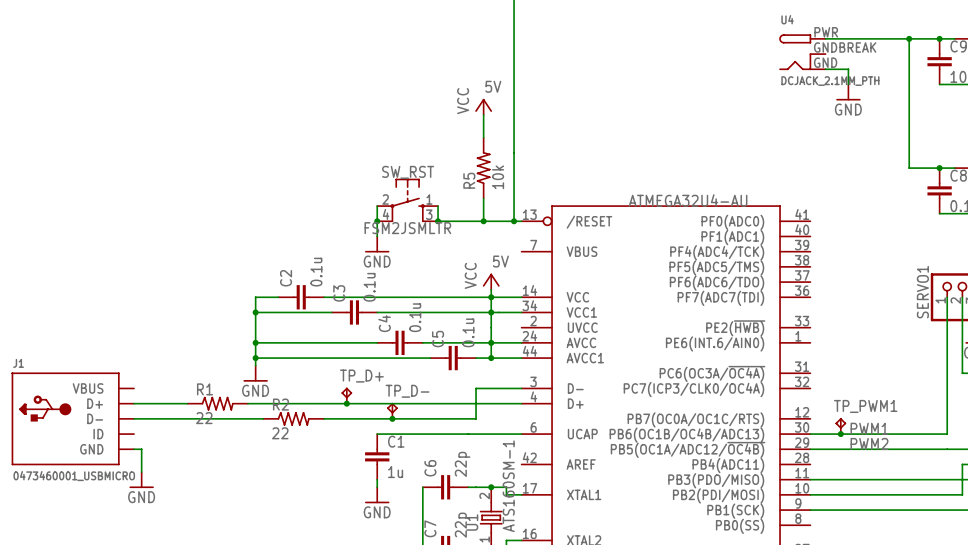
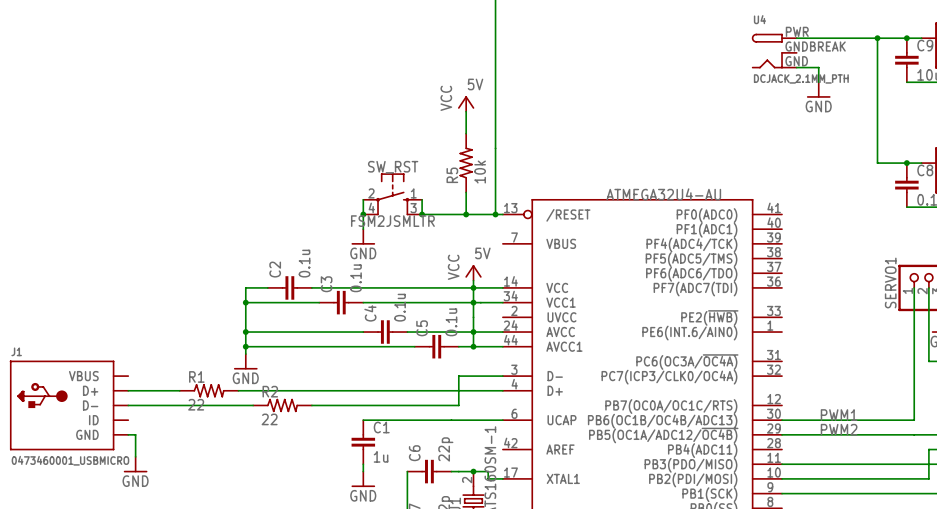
TP_D+: (346, 395) -> none
junction: (346, 403) -> none
TP_D-: (392, 410) -> none
junction: (392, 418) -> none
TP_PWM1: (840, 426) -> none
junction: (840, 434) -> none

